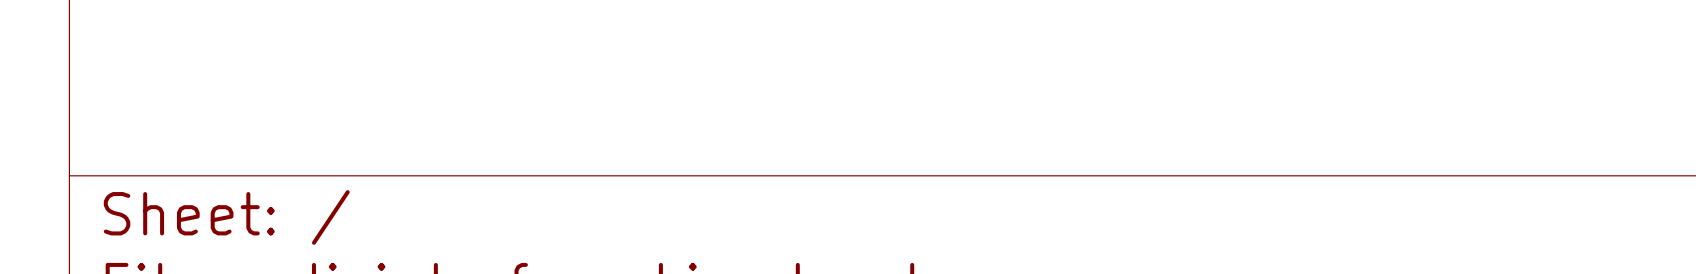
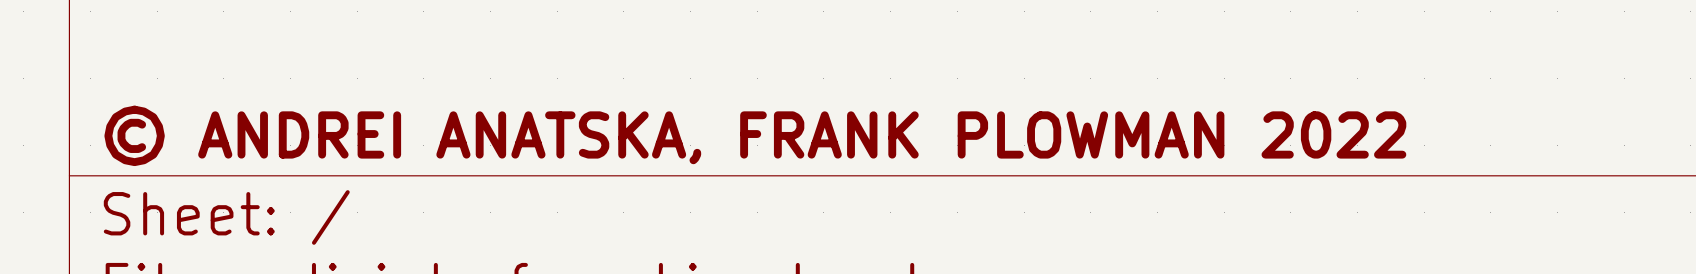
title block: none -> © ANDREI ANATSKA, FRANK PLOWMAN 2022 (755, 135)

